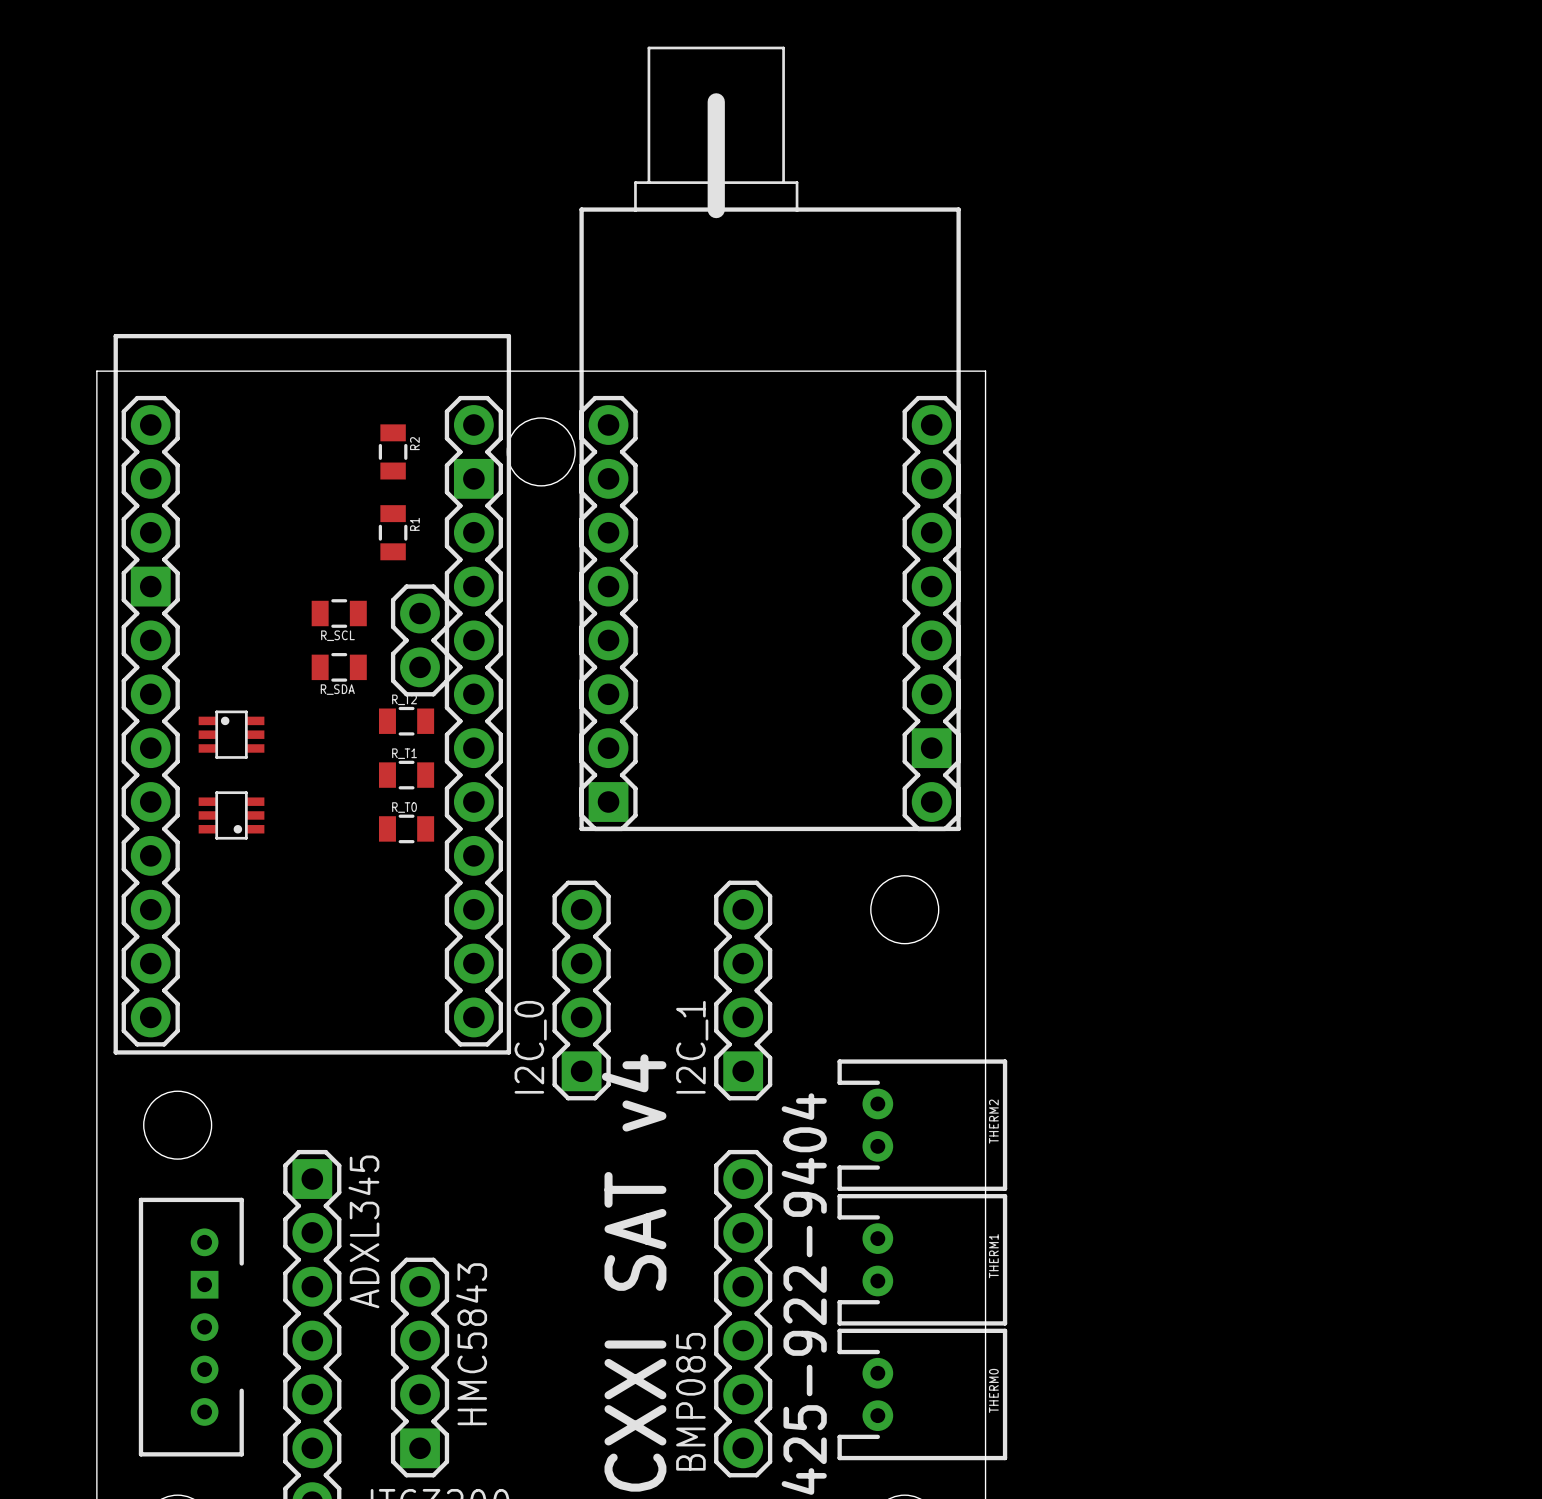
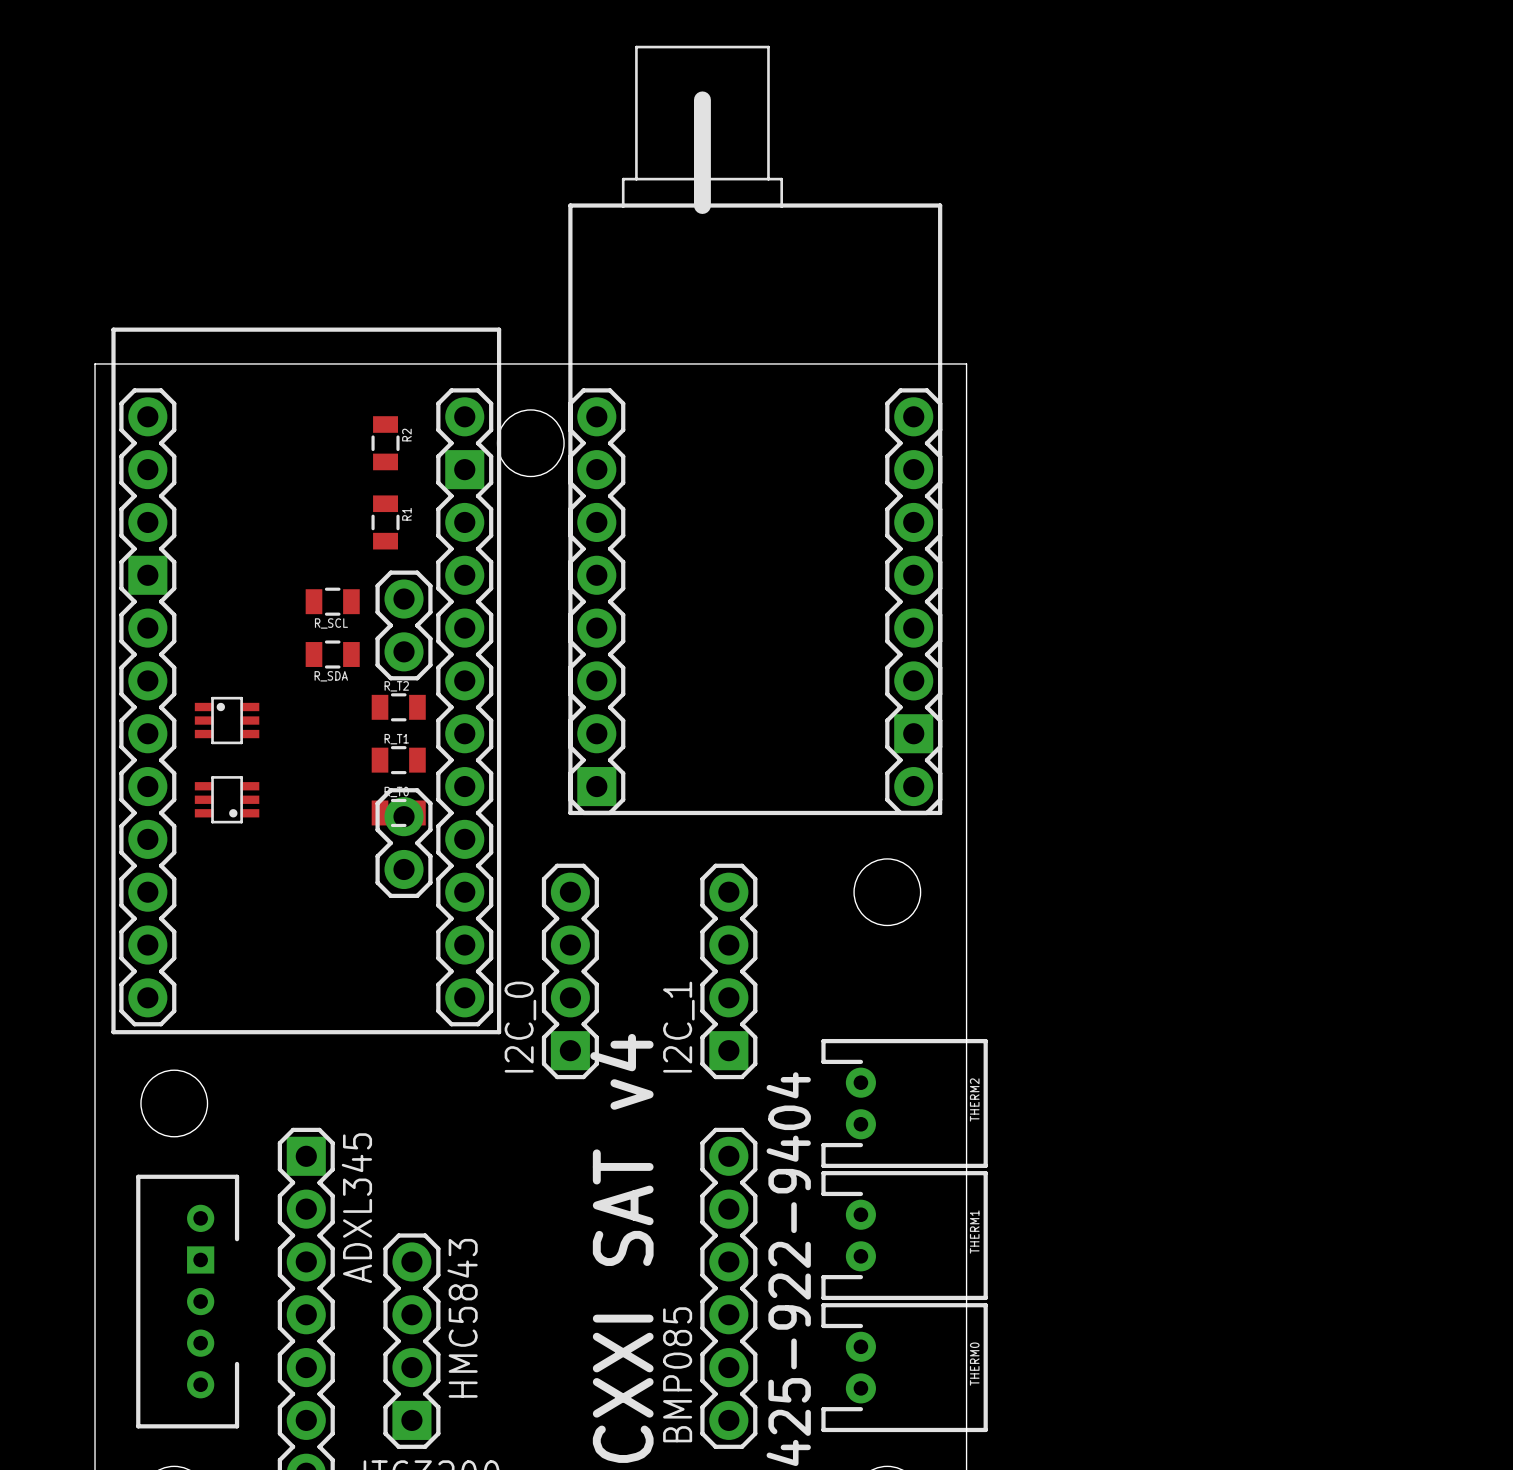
part footprint: [113, 333, 512, 1055] -> [111, 327, 502, 1035]

